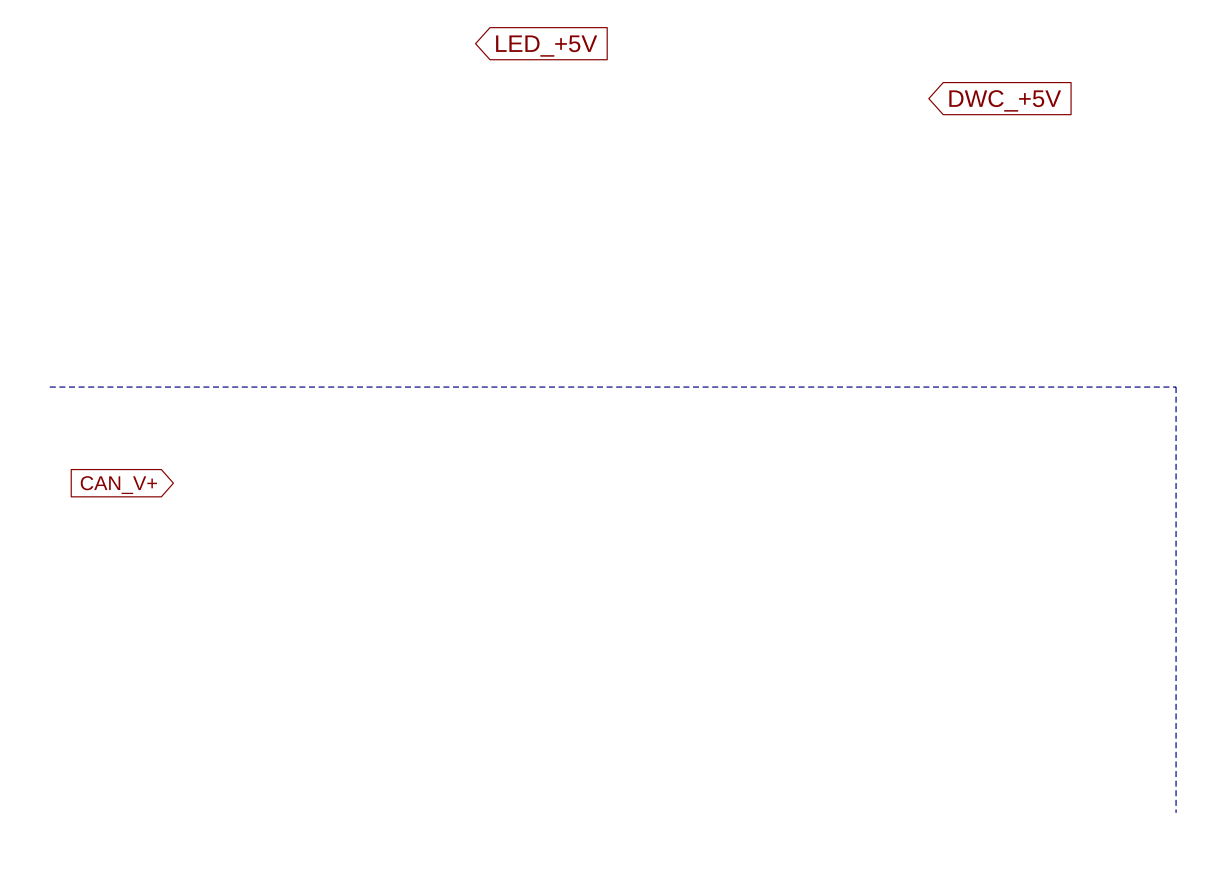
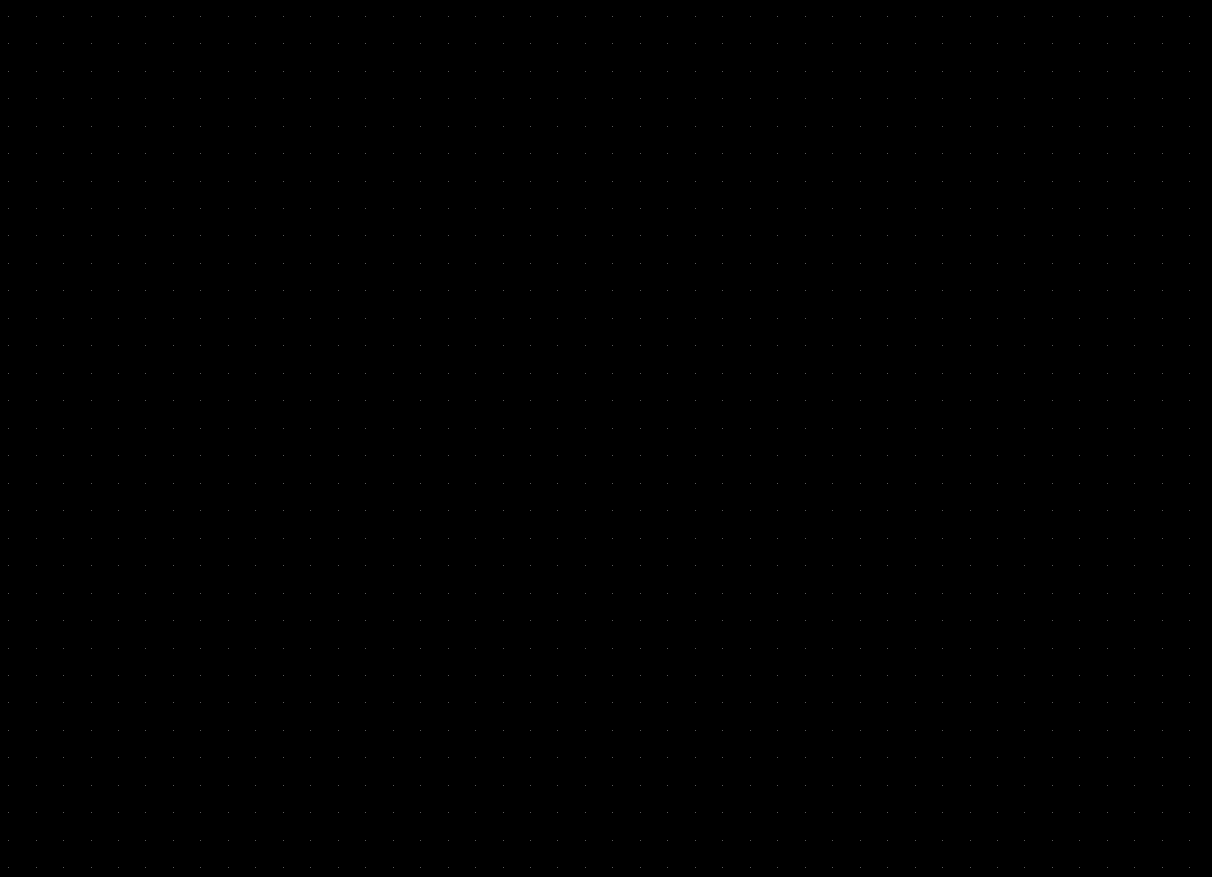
global label: LED_+5V (546, 46) -> none
global label: DWC_+5V (1005, 100) -> none
line: (49, 387) (1176, 387) (1176, 812) -> none
global label: CAN_V+ (118, 485) -> none

